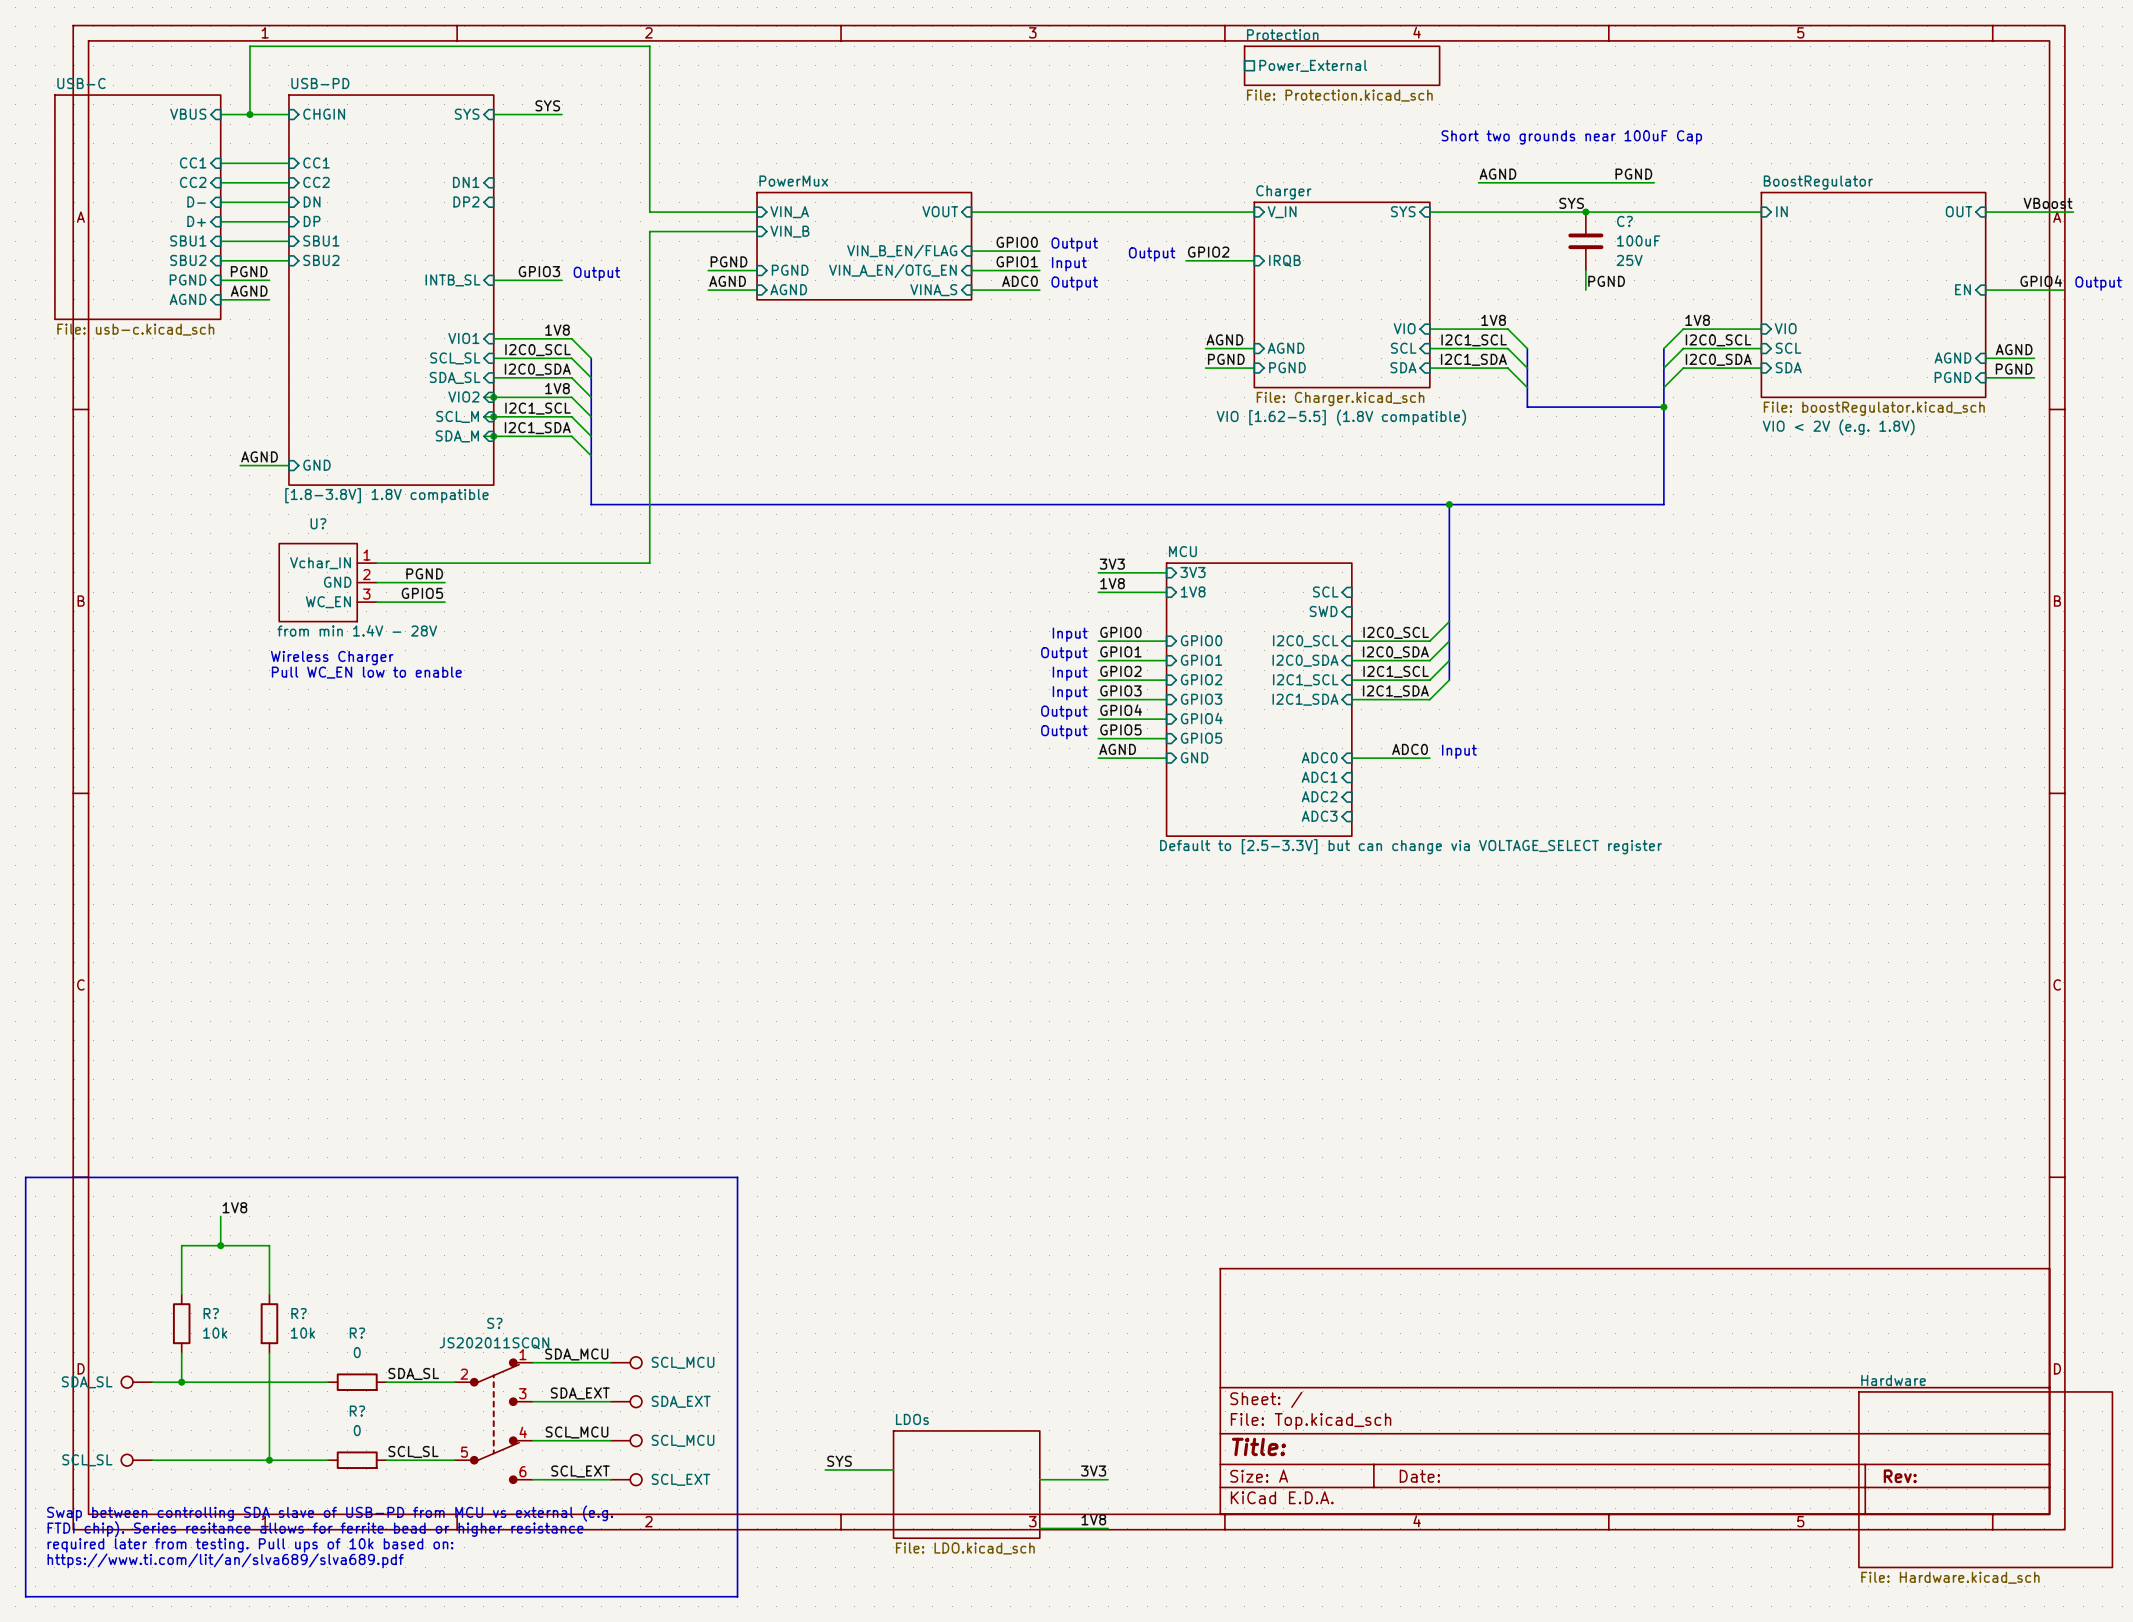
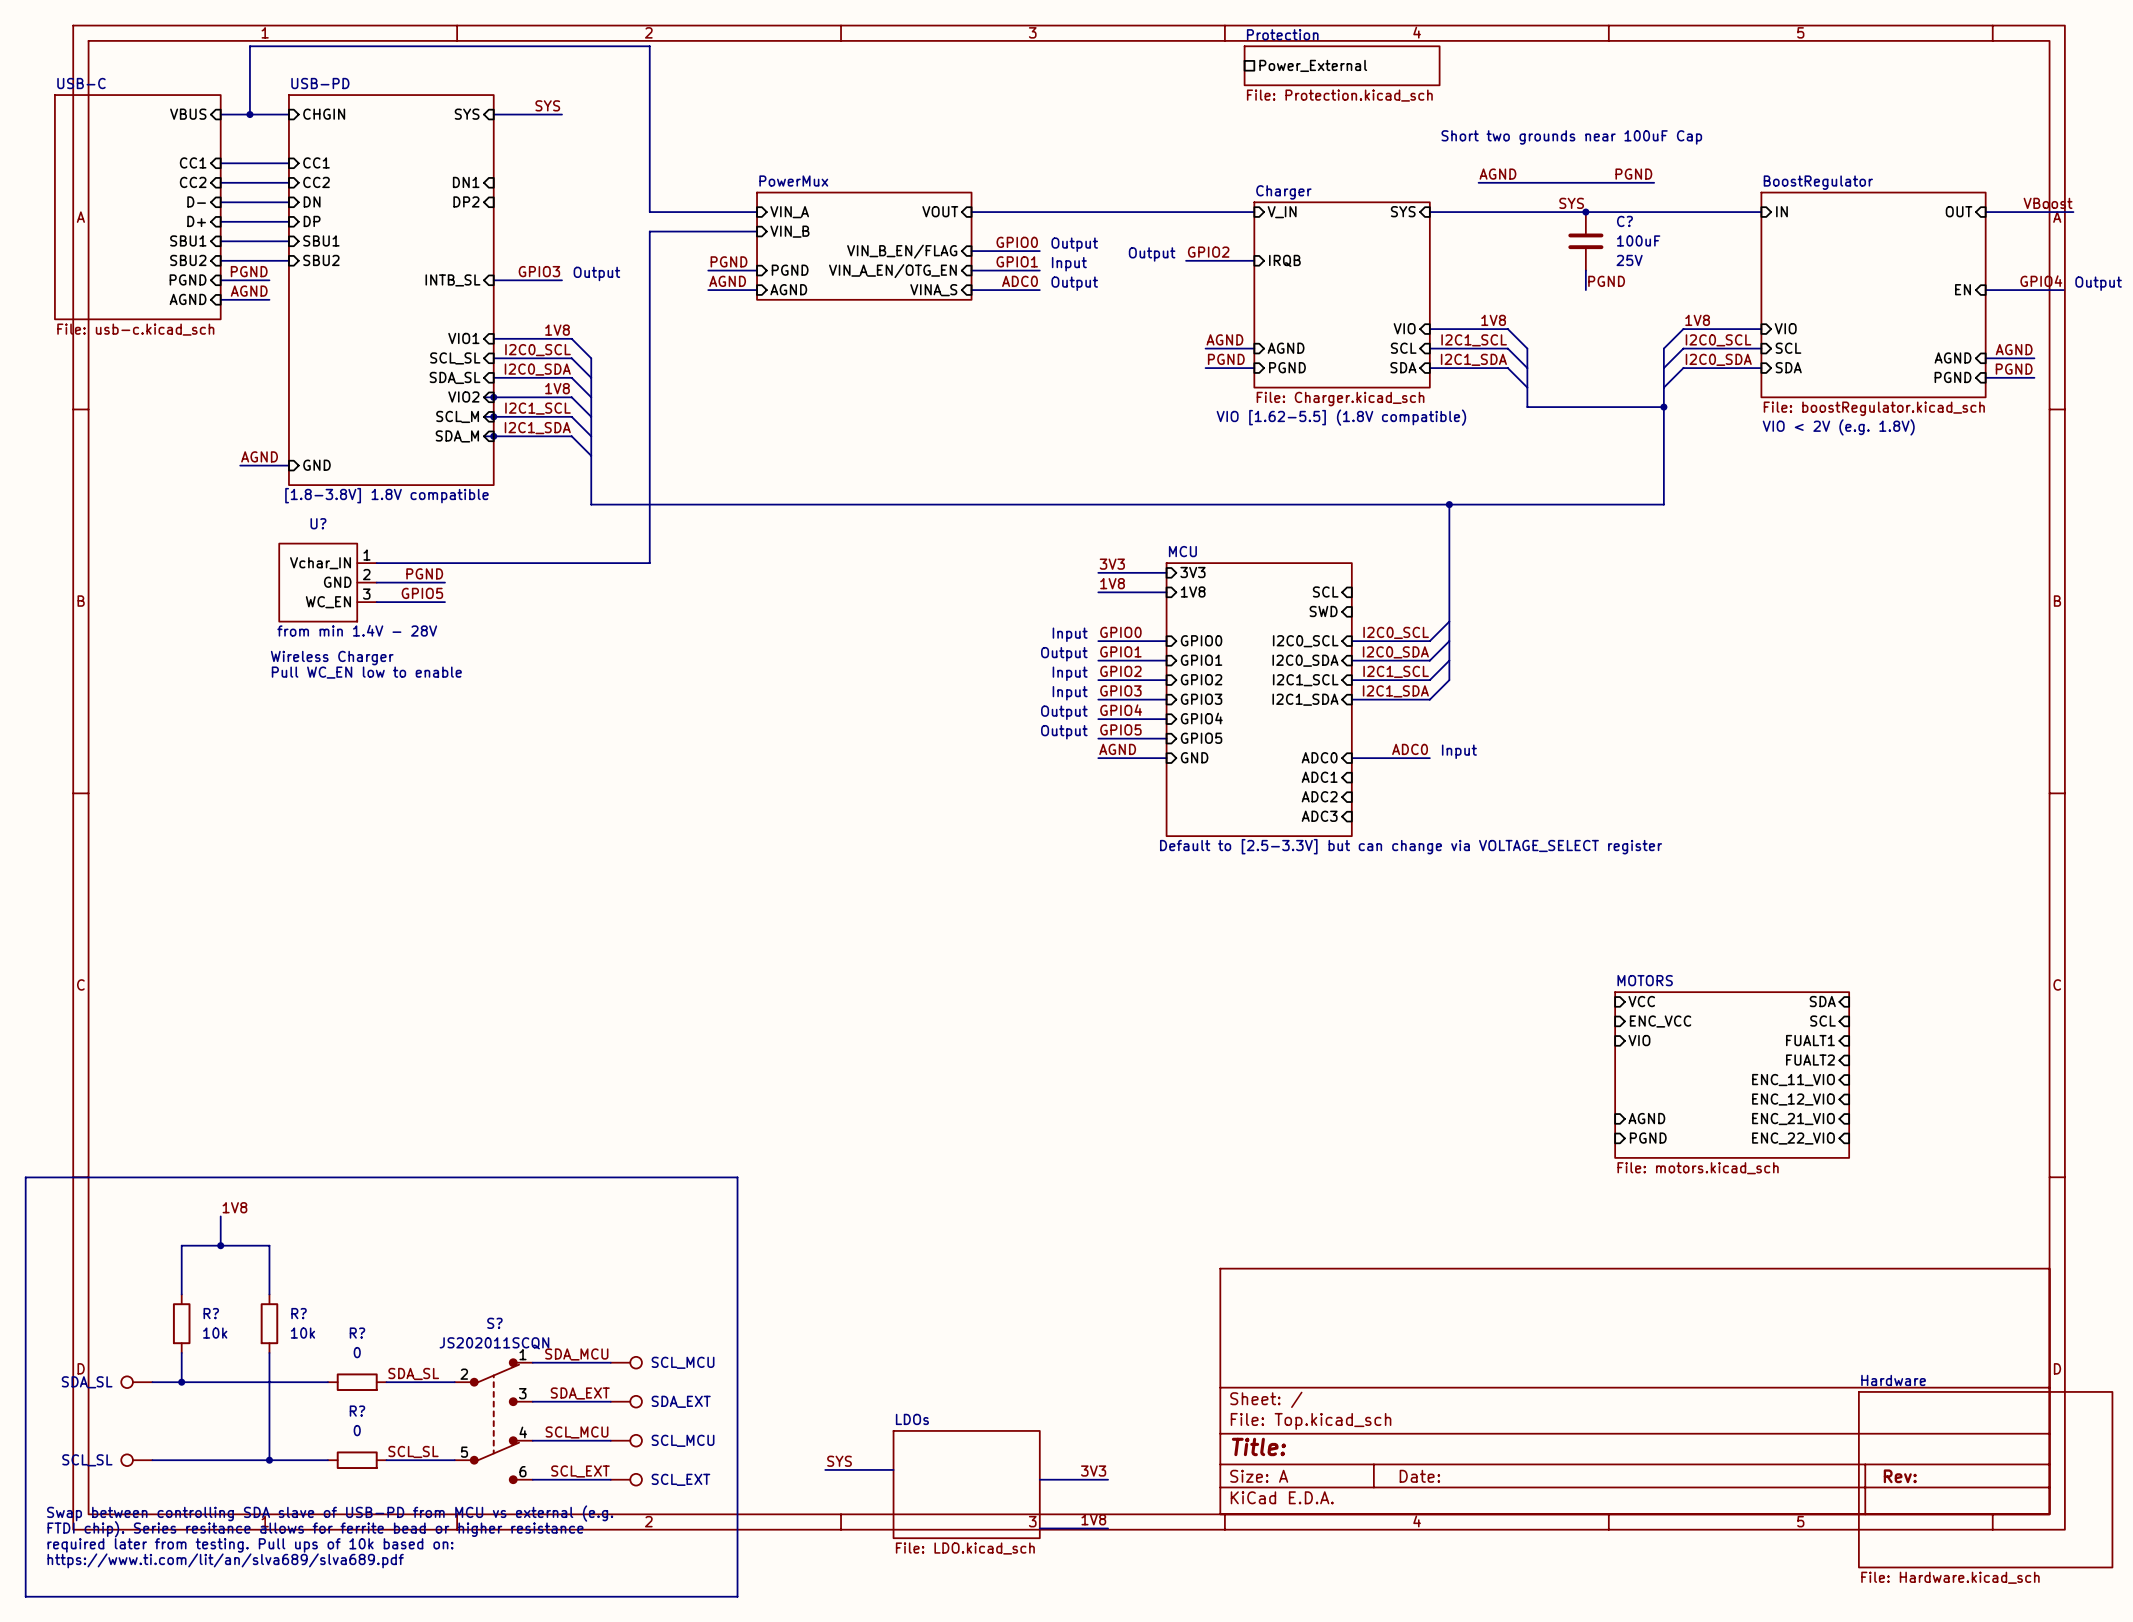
sheet pin: none -> VCC (1641, 1001)
sheet pin: none -> SDA (1822, 1001)
sheet pin: none -> ENC_VCC (1660, 1021)
sheet pin: none -> SCL (1823, 1021)
sheet pin: none -> VIO (1639, 1040)
sheet pin: none -> FUALT1 (1810, 1040)
sheet pin: none -> FUALT2 (1810, 1060)
sheet MOTORS: none -> File: motors.kicad_sch (1732, 1075)
sheet pin: none -> ENC_11_VIO (1793, 1080)
sheet pin: none -> ENC_12_VIO (1793, 1099)
sheet pin: none -> AGND (1646, 1118)
sheet pin: none -> ENC_21_VIO (1793, 1119)
sheet pin: none -> PGND (1648, 1138)
sheet pin: none -> ENC_22_VIO (1793, 1138)

